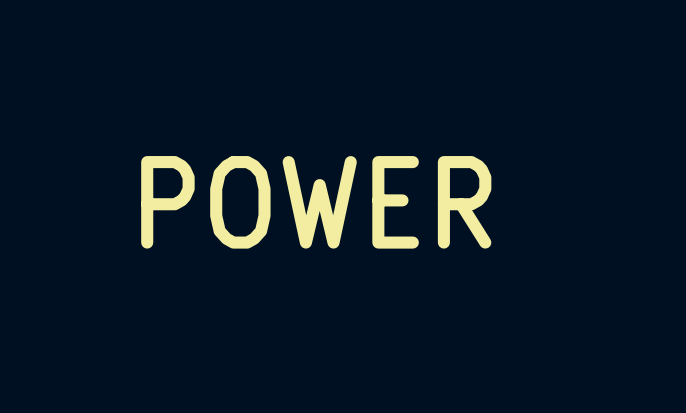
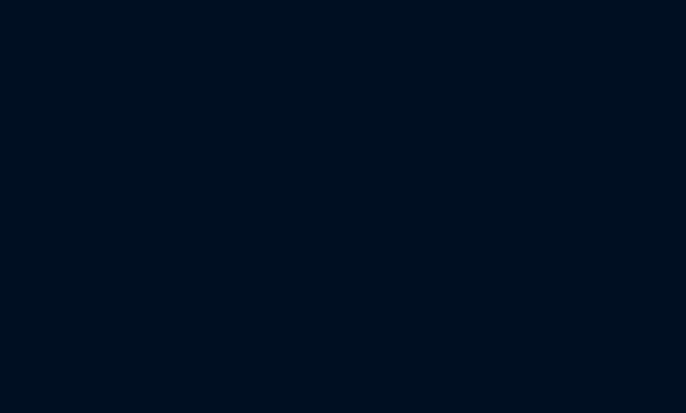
text: POWER (316, 202) -> none

